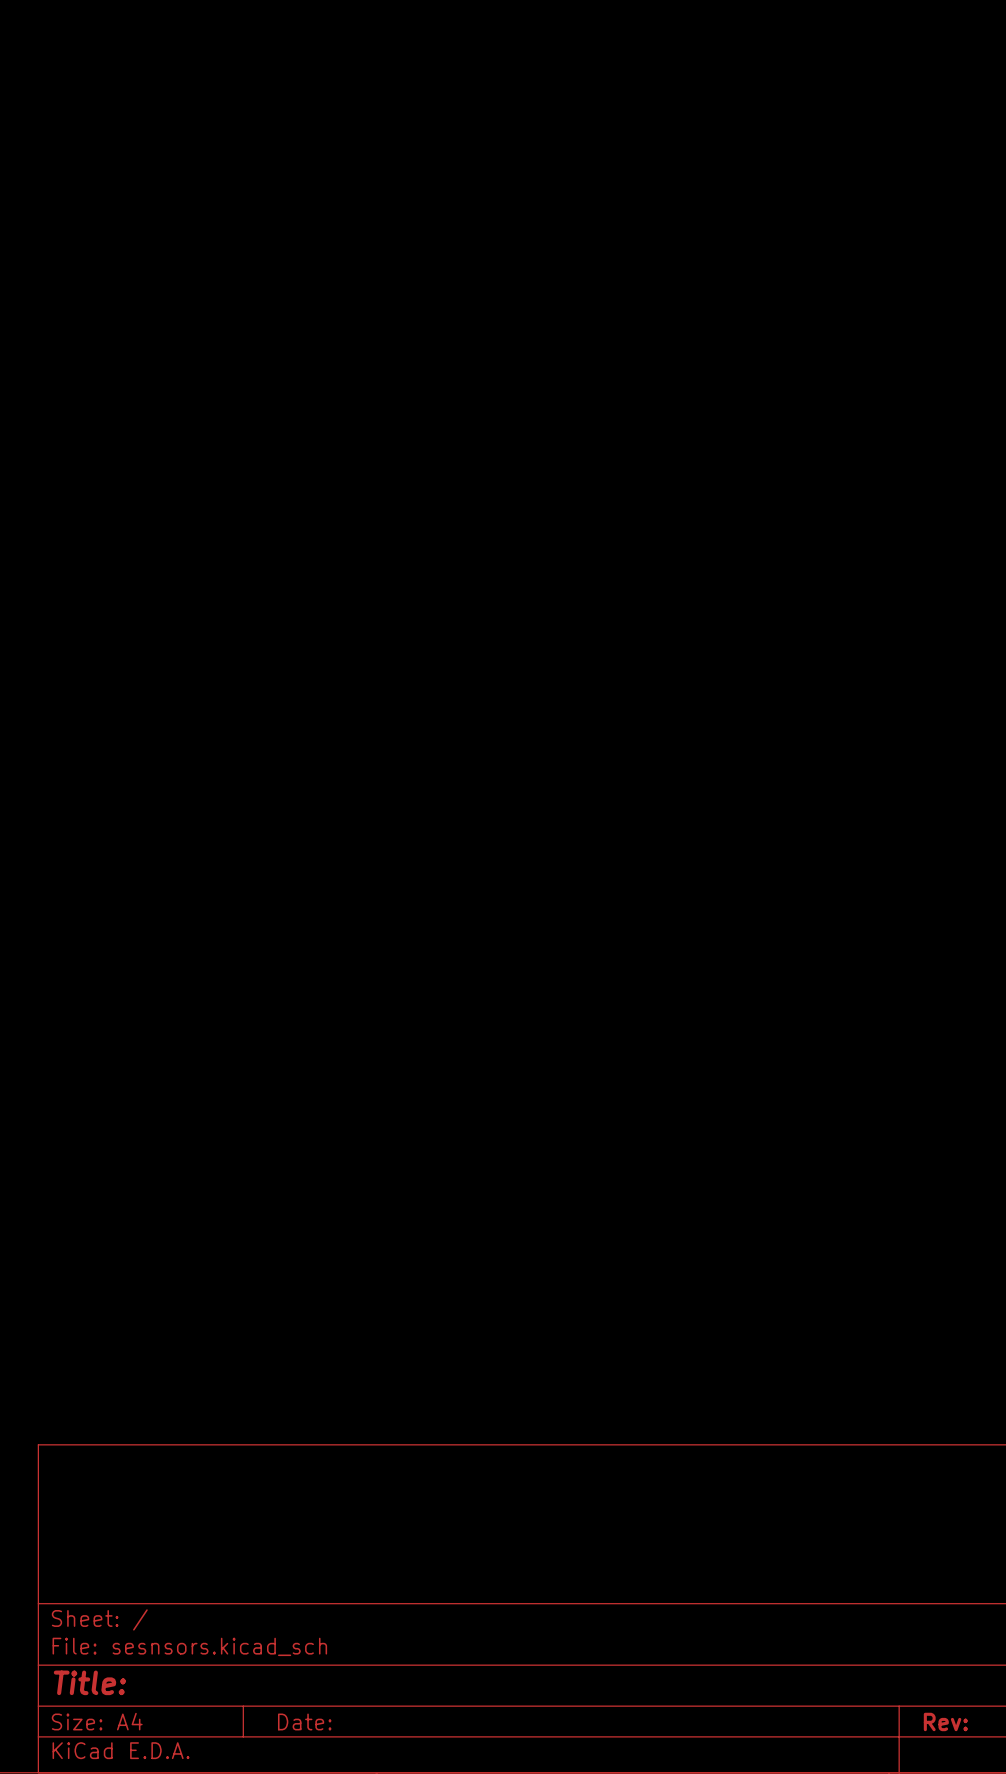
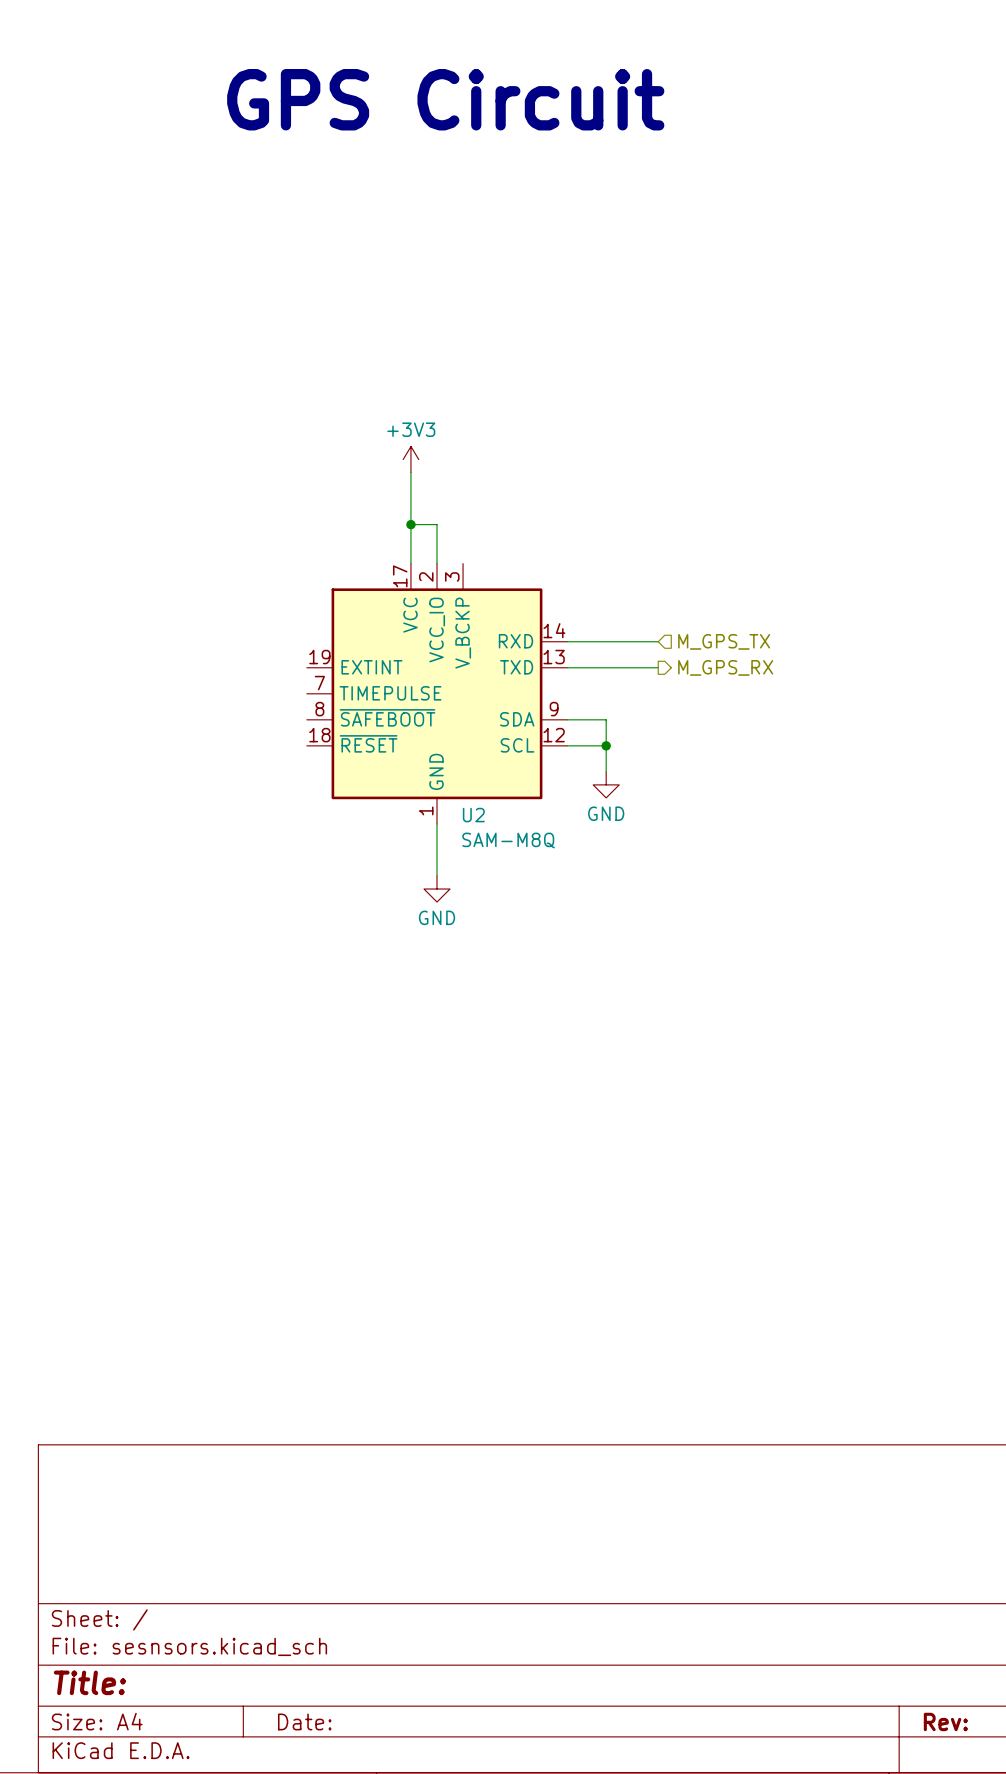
text: none -> GPS Circuit (445, 99)
power symbol: none -> +3V3 (410, 459)
wire: none -> (410, 472) (410, 563)
wire: none -> (410, 524) (437, 524) (437, 563)
junction: none -> (410, 524)
wire: none -> (567, 641) (658, 641)
hierarchical label: none -> M_GPS_TX (724, 641)
wire: none -> (567, 667) (658, 667)
hierarchical label: none -> M_GPS_RX (725, 667)
U2: none -> SAM-M8Q (437, 693)
wire: none -> (567, 719) (606, 719) (606, 771)
wire: none -> (567, 745) (606, 745)
junction: none -> (606, 745)
power symbol: none -> GND (606, 784)
wire: none -> (437, 823) (437, 876)
power symbol: none -> GND (437, 889)

